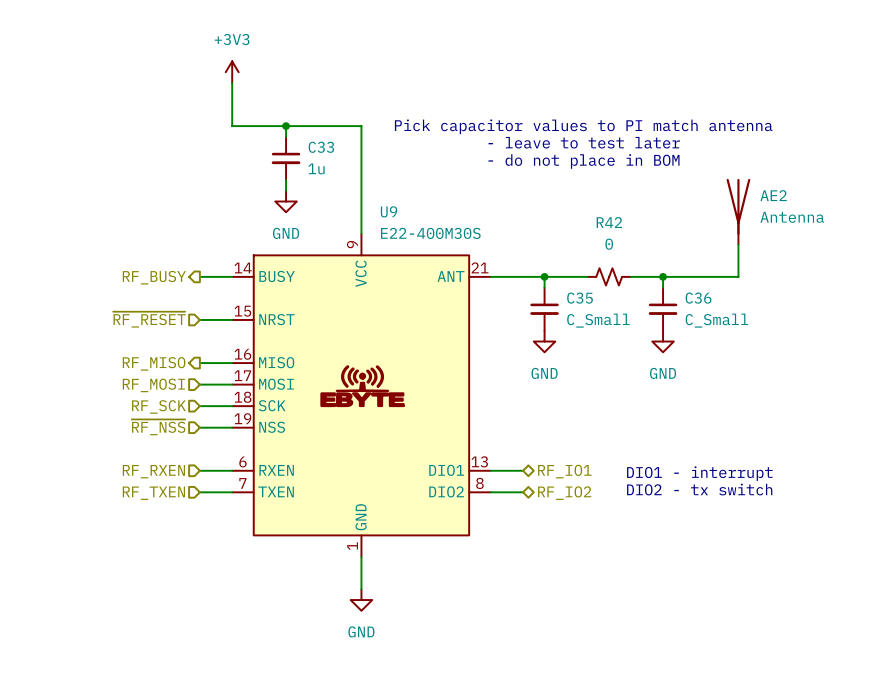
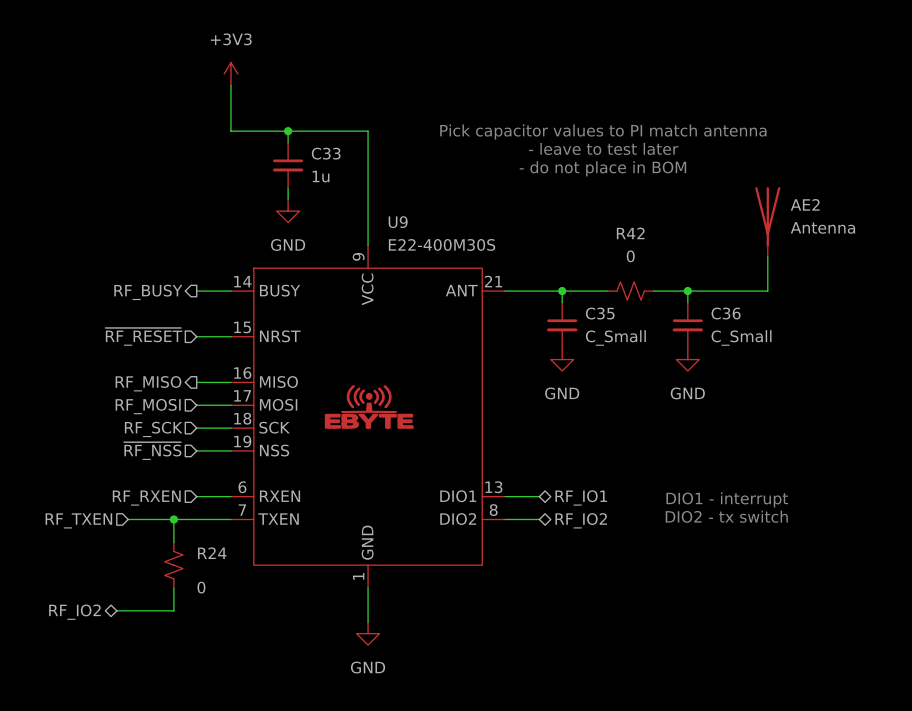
wire: none -> (128, 519) (196, 519)
wire: none -> (173, 519) (173, 542)
junction: none -> (173, 519)
hierarchical label position: RF_TXEN (153, 493) -> RF_TXEN (78, 520)
R24: none -> 0 (173, 565)
wire: none -> (173, 588) (173, 610) (116, 610)
hierarchical label: none -> RF_IO2 (74, 612)

